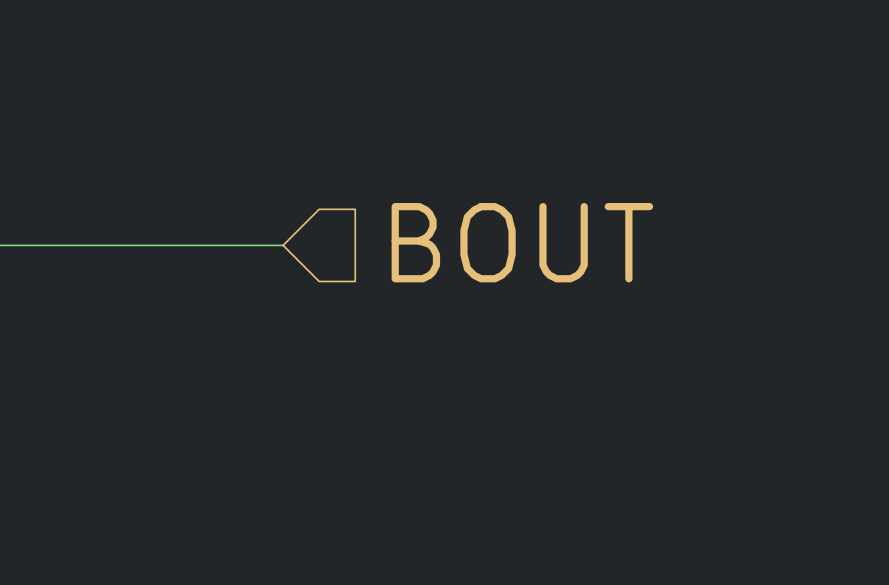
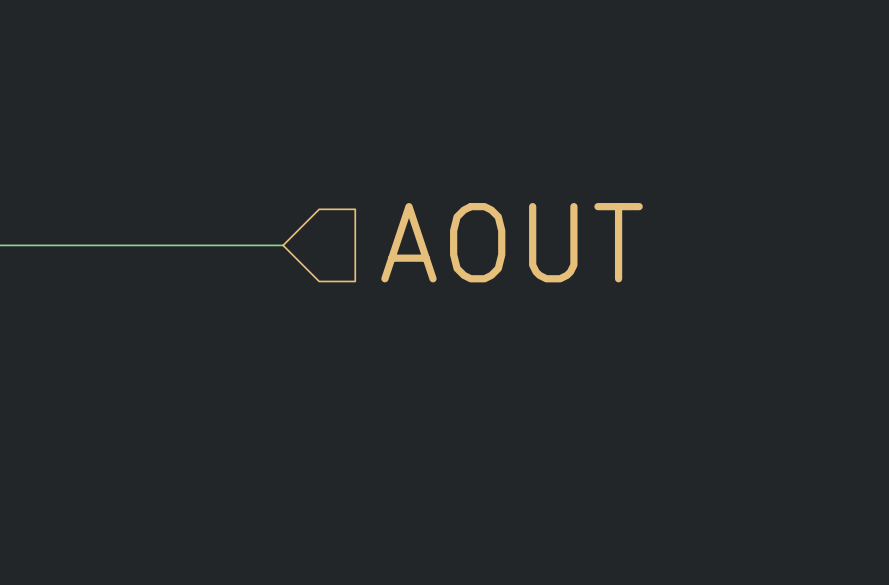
hierarchical label: BOUT (522, 242) -> AOUT (512, 242)

